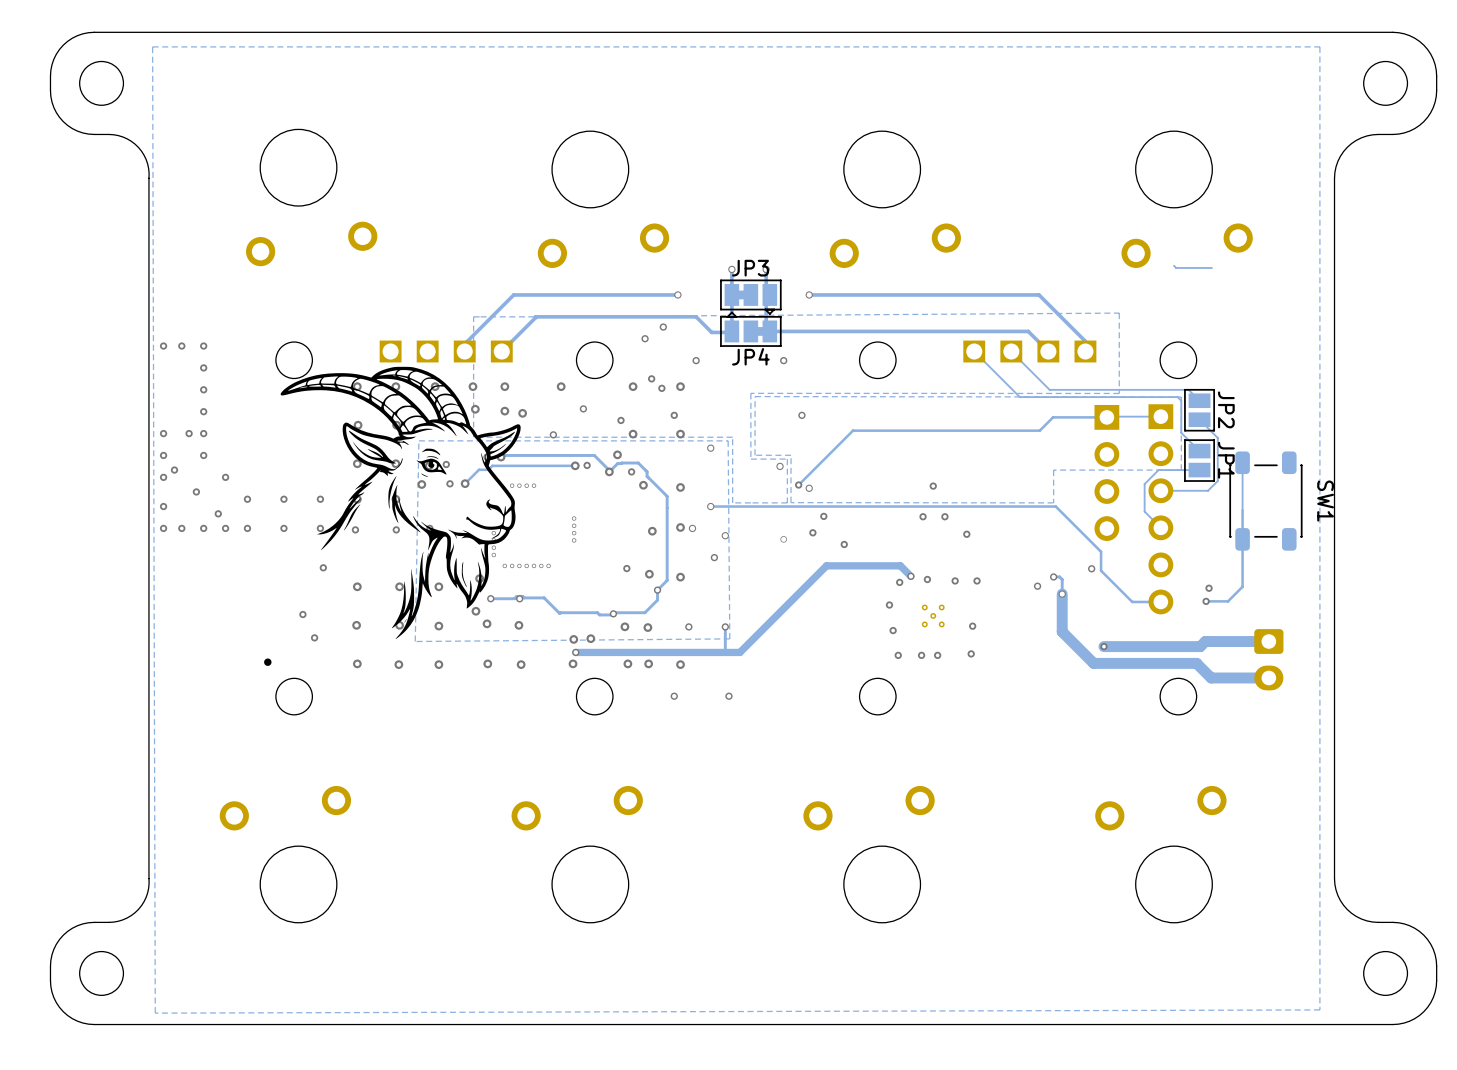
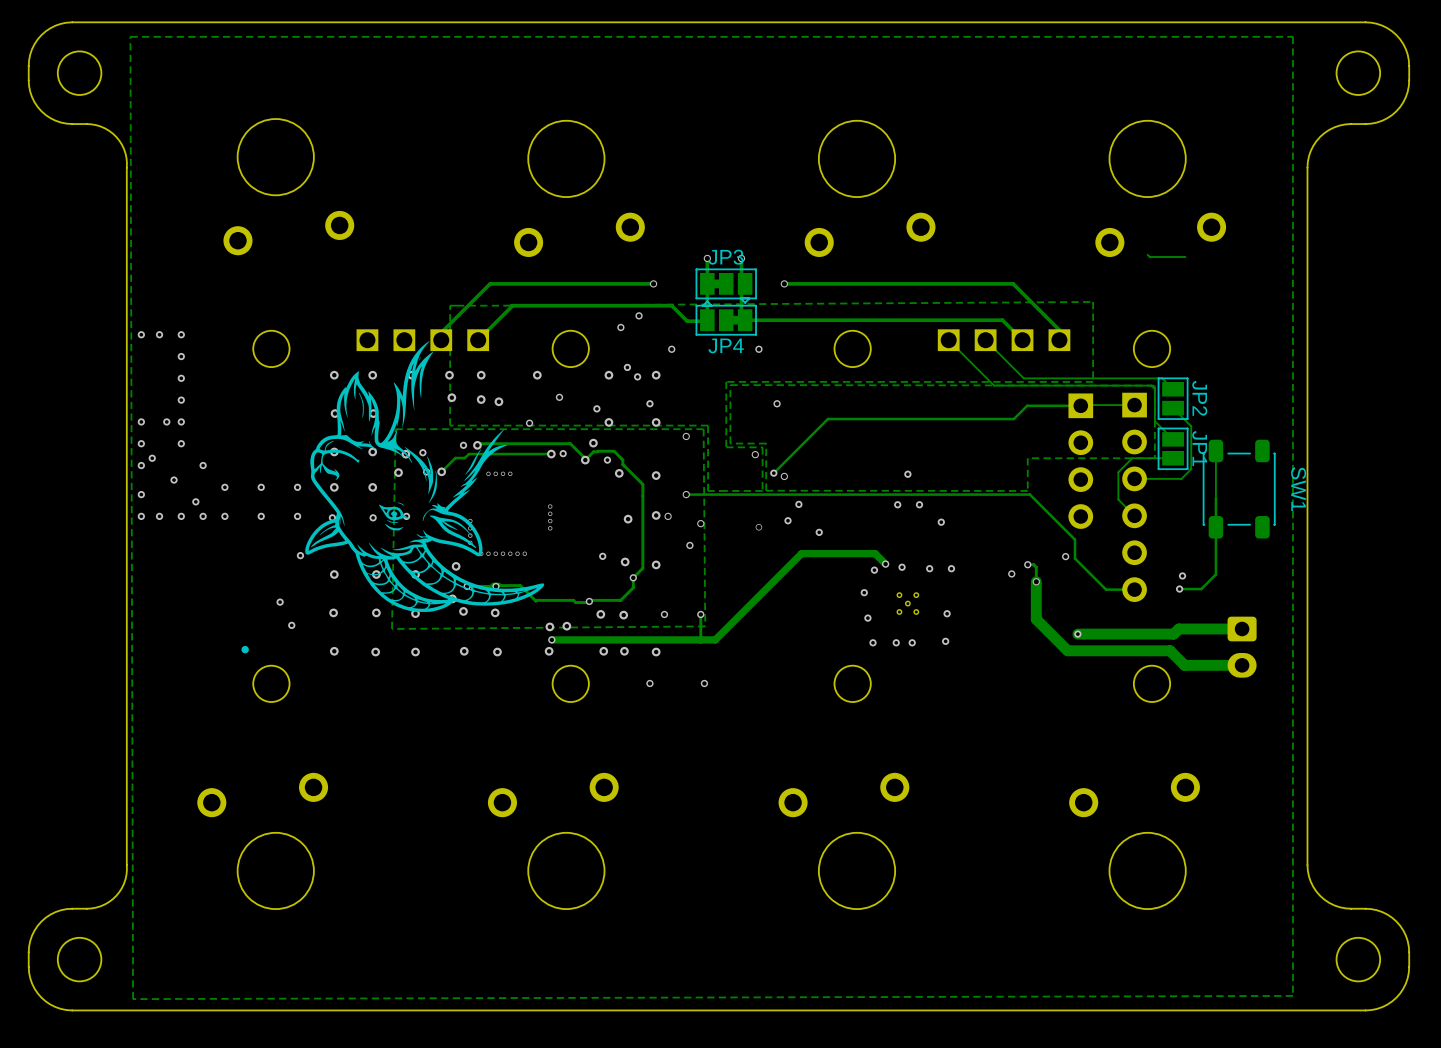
drawing: none -> [305, 340, 545, 612]
drawing: [280, 366, 521, 639] -> none

